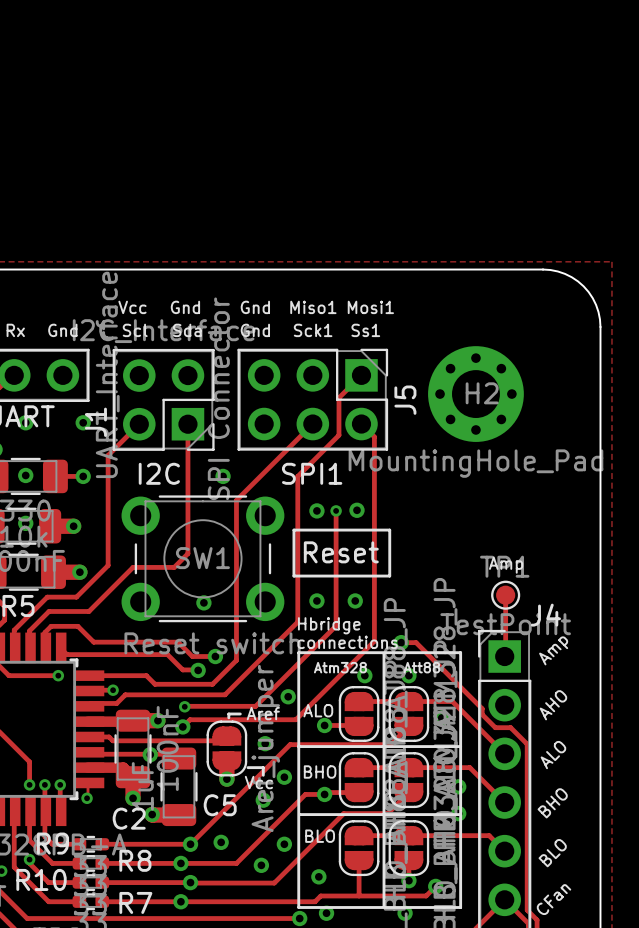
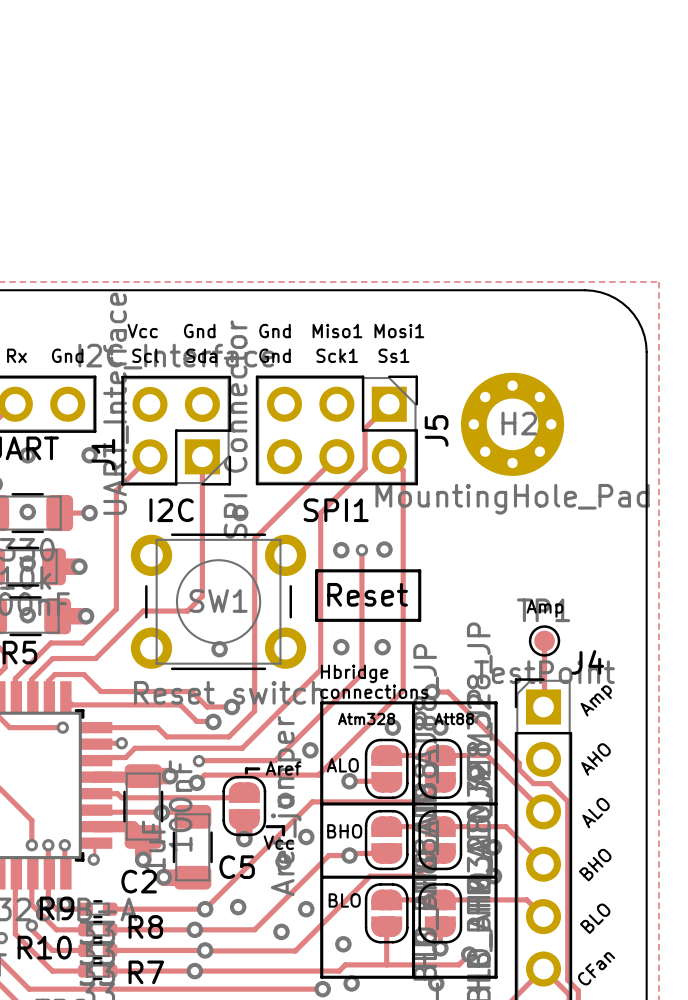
via: none -> (27, 615)

